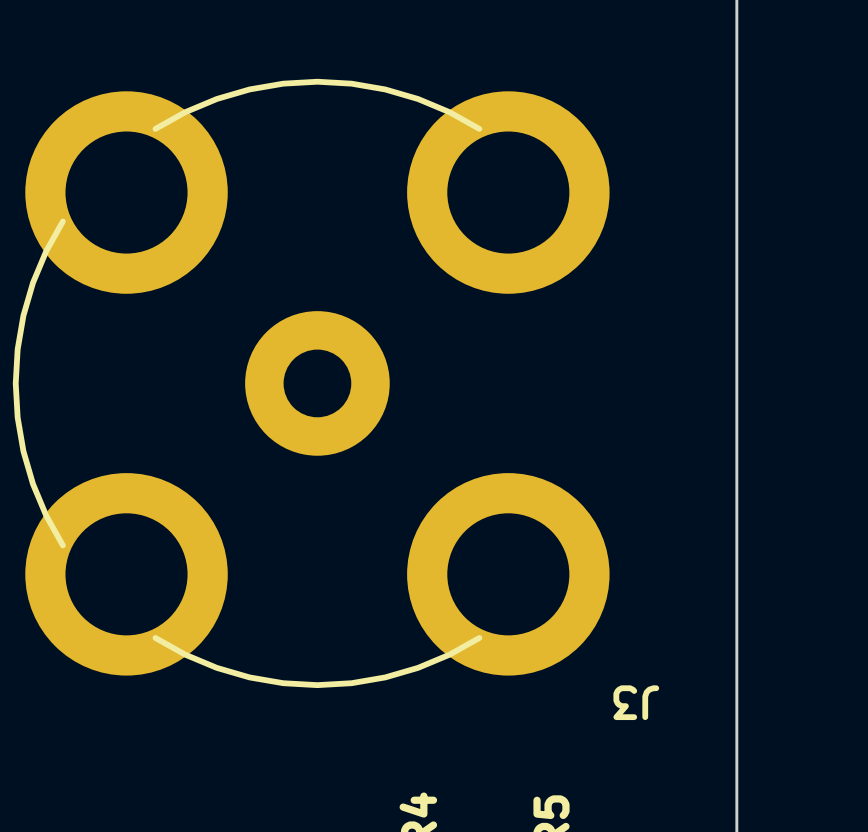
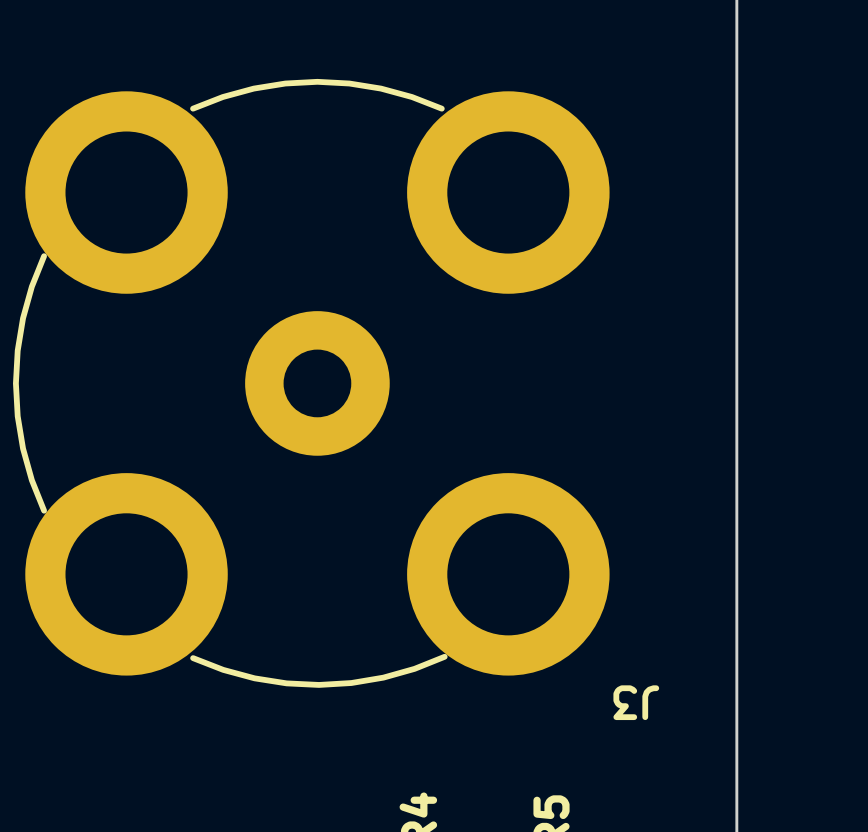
J3 footprint: [12, 78, 610, 689] -> [13, 78, 610, 688]

